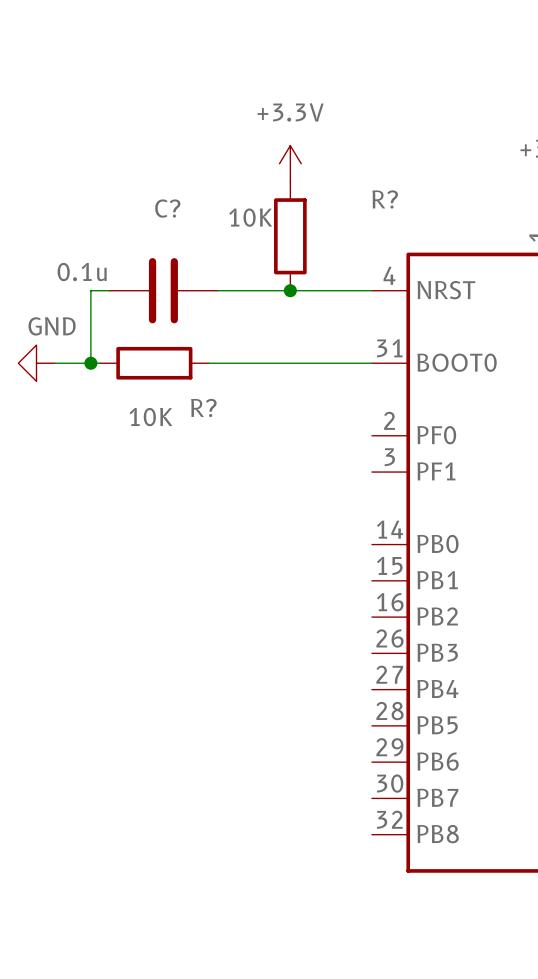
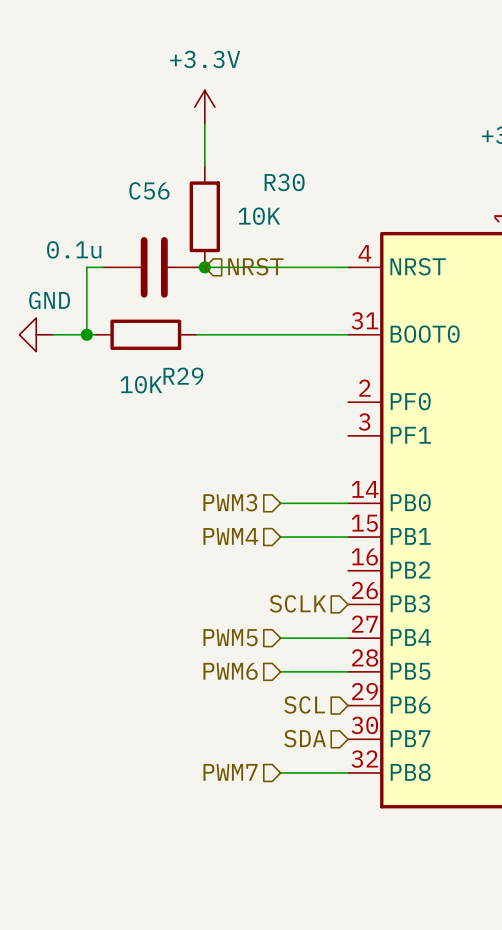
wire: none -> (204, 124) (204, 166)
power symbol position: +3.3V (290, 163) -> +3.3V (204, 107)
C? name: C? (167, 208) -> C56 (149, 190)
R30: none -> 10K (204, 216)
R?: 10K (290, 236) -> none
hierarchical label: none -> NRST (255, 266)
junction position: (290, 290) -> (204, 267)
R? name: R? (203, 408) -> R29 (183, 376)
hierarchical label: none -> PWM3 (230, 502)
wire: none -> (280, 503) (348, 503)
hierarchical label: none -> PWM4 (230, 536)
wire: none -> (280, 537) (348, 537)
hierarchical label: none -> SCLK (297, 603)
hierarchical label: none -> PWM5 (230, 637)
wire: none -> (280, 638) (348, 638)
hierarchical label: none -> PWM6 (230, 671)
wire: none -> (280, 671) (348, 671)
hierarchical label: none -> SCL (304, 704)
hierarchical label: none -> SDA (305, 738)
hierarchical label: none -> PWM7 (230, 772)
wire: none -> (280, 773) (348, 773)

